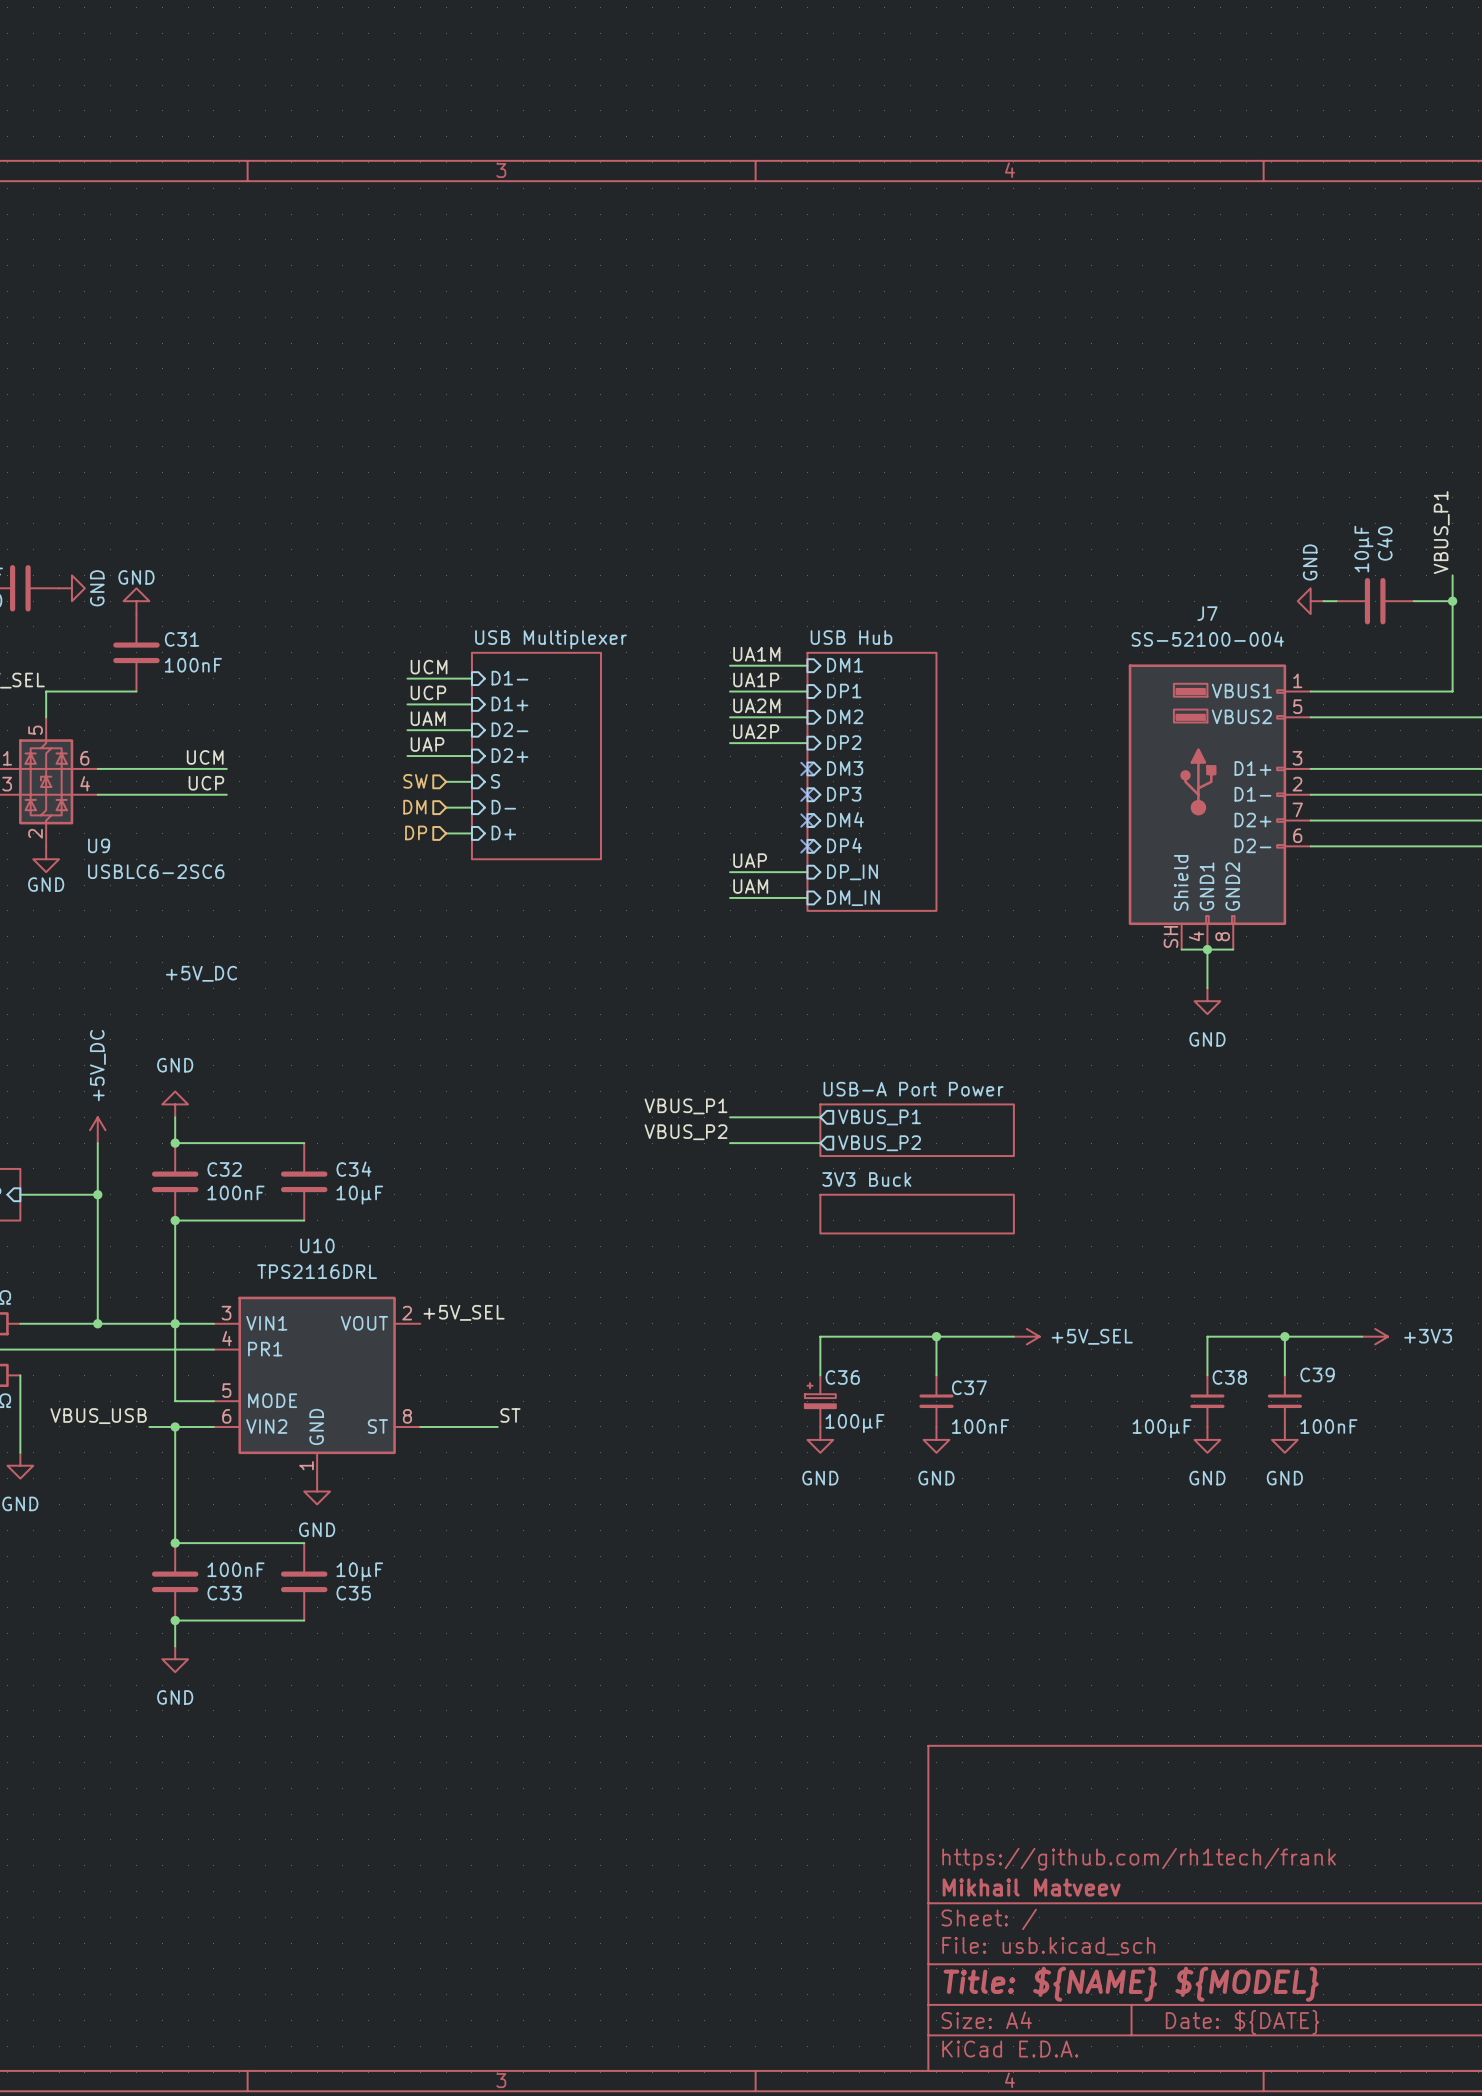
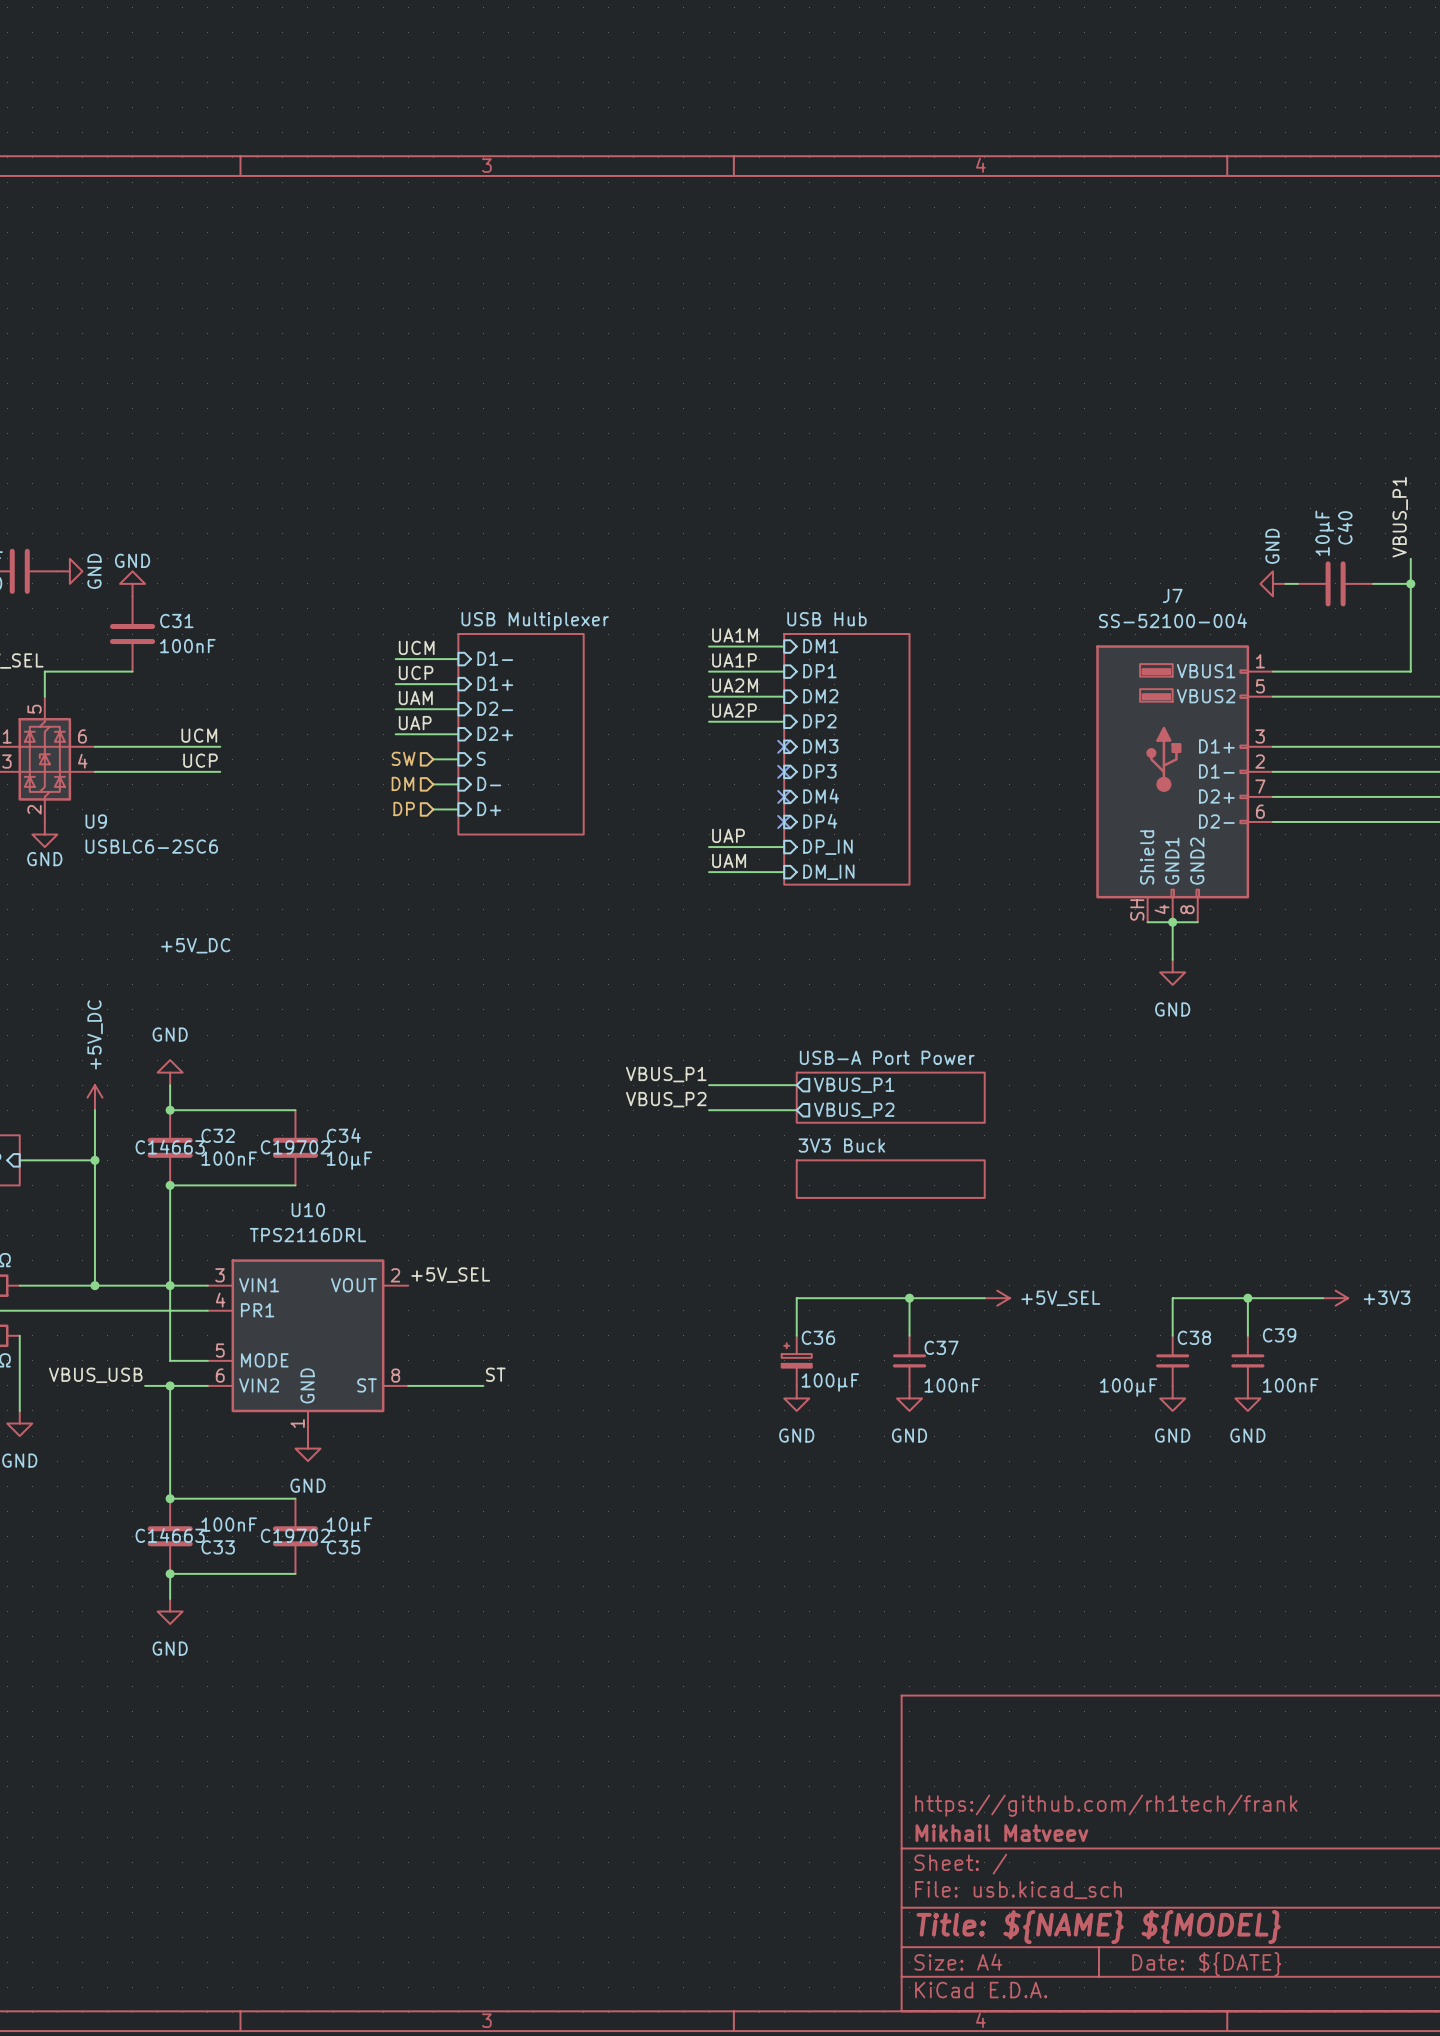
C32 text: none -> C14663 (170, 1147)
C34 text: none -> C19702 (295, 1147)
C33 text: none -> C14663 (170, 1535)
C35 text: none -> C19702 (295, 1535)

